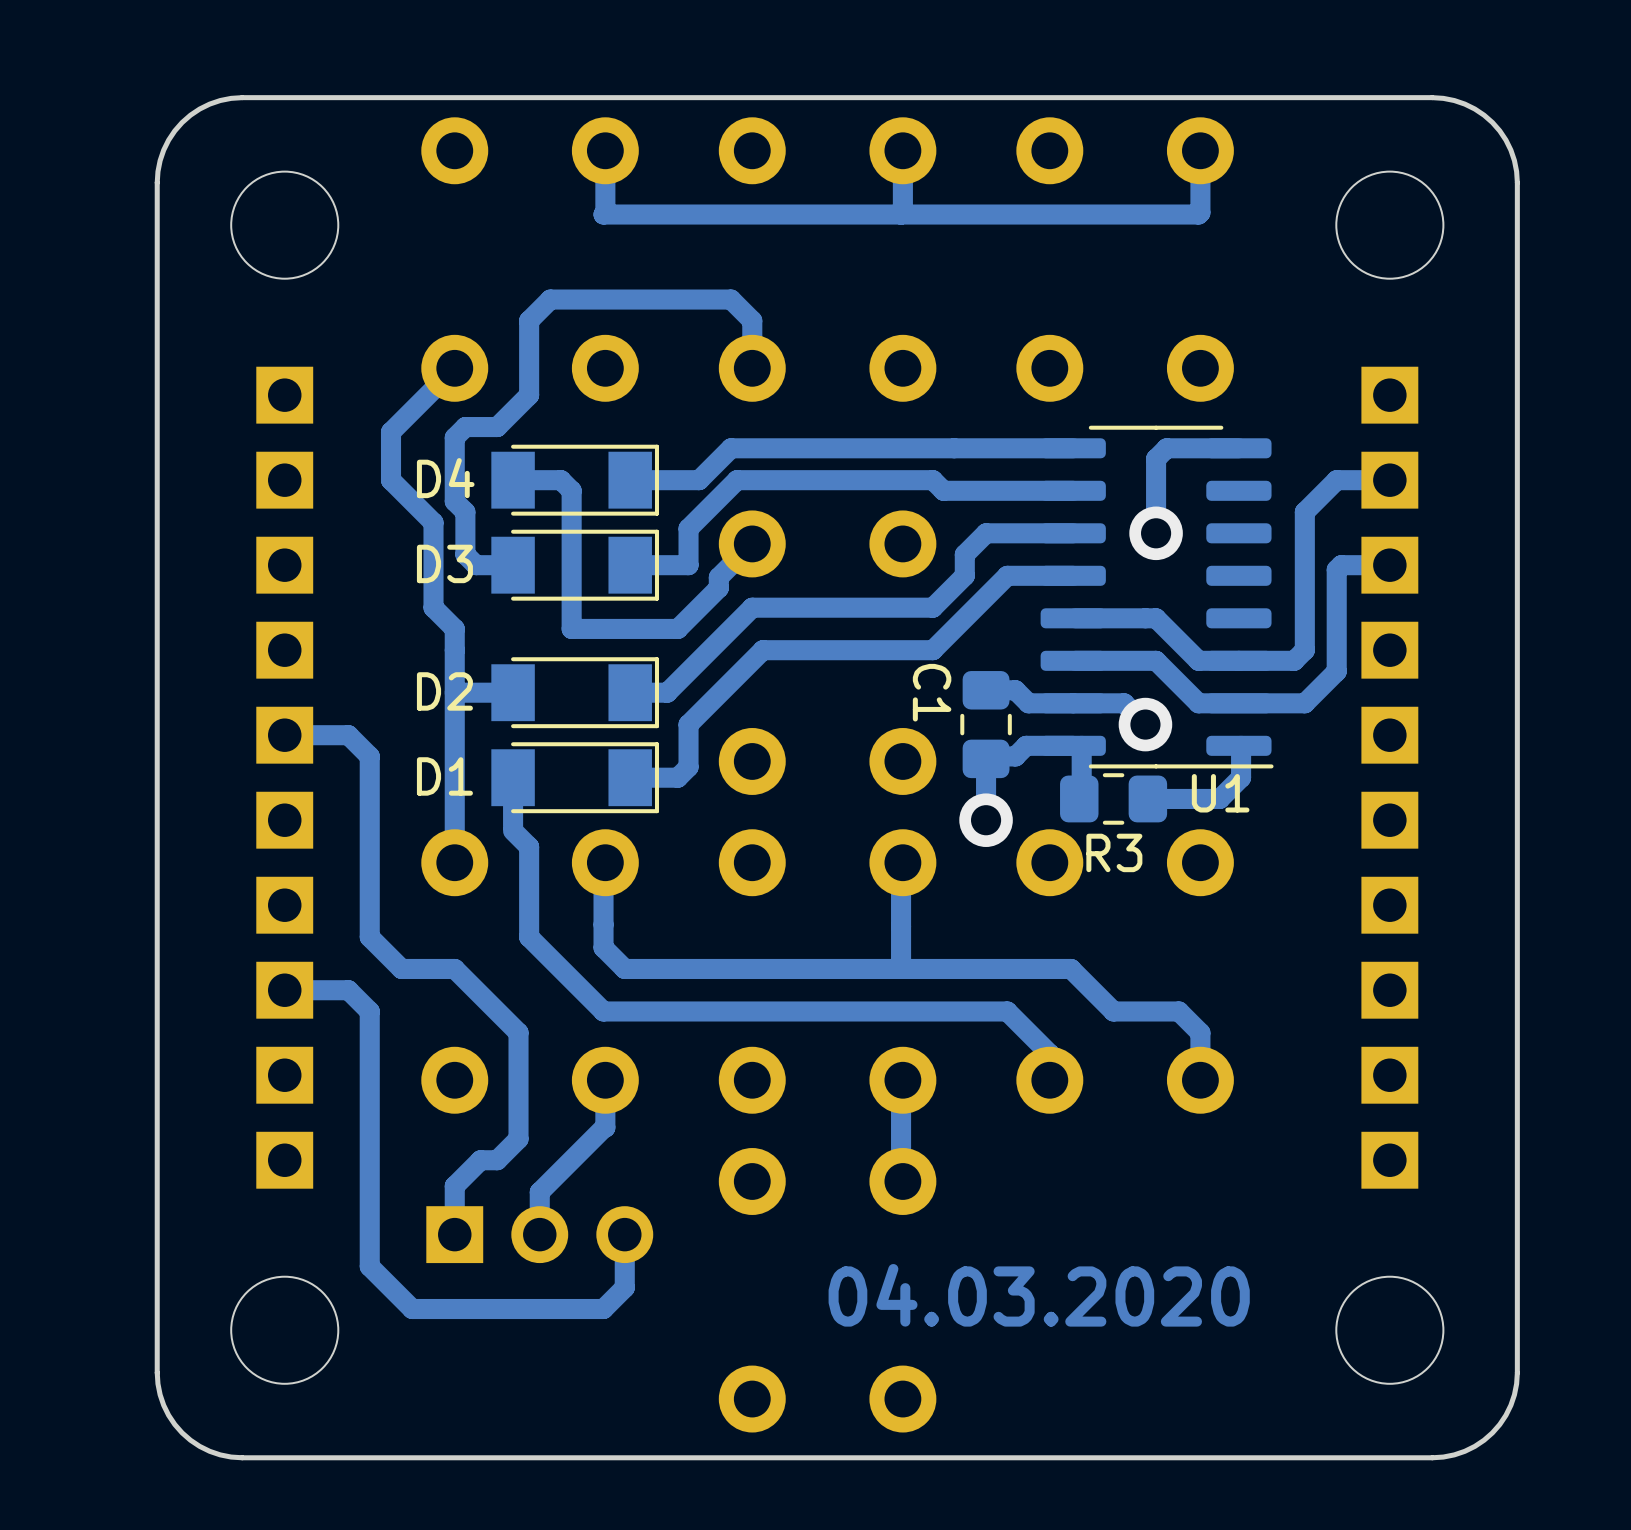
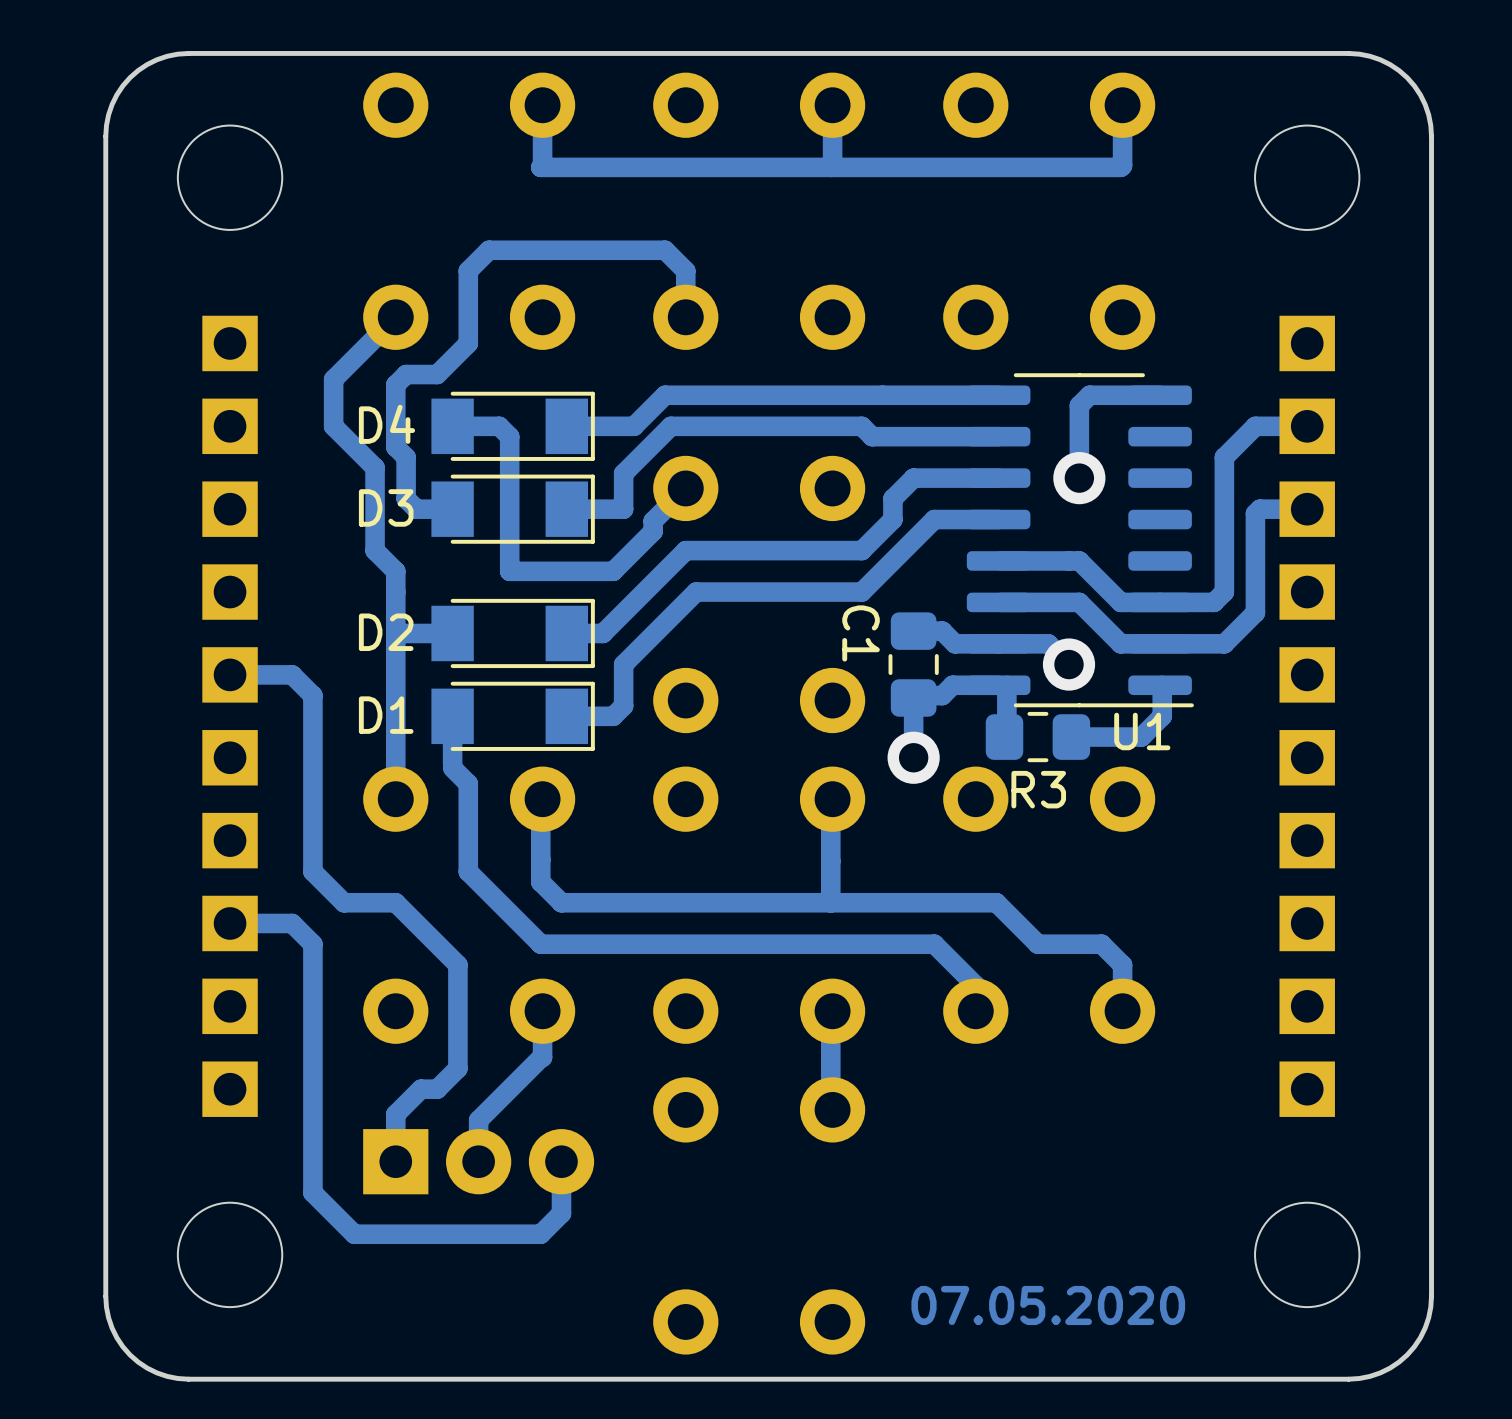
part footprint: [426, 1206, 654, 1264] -> [363, 1129, 595, 1195]
text: 04.03.2020 (1039, 1295) -> 07.05.2020 (1048, 1305)

